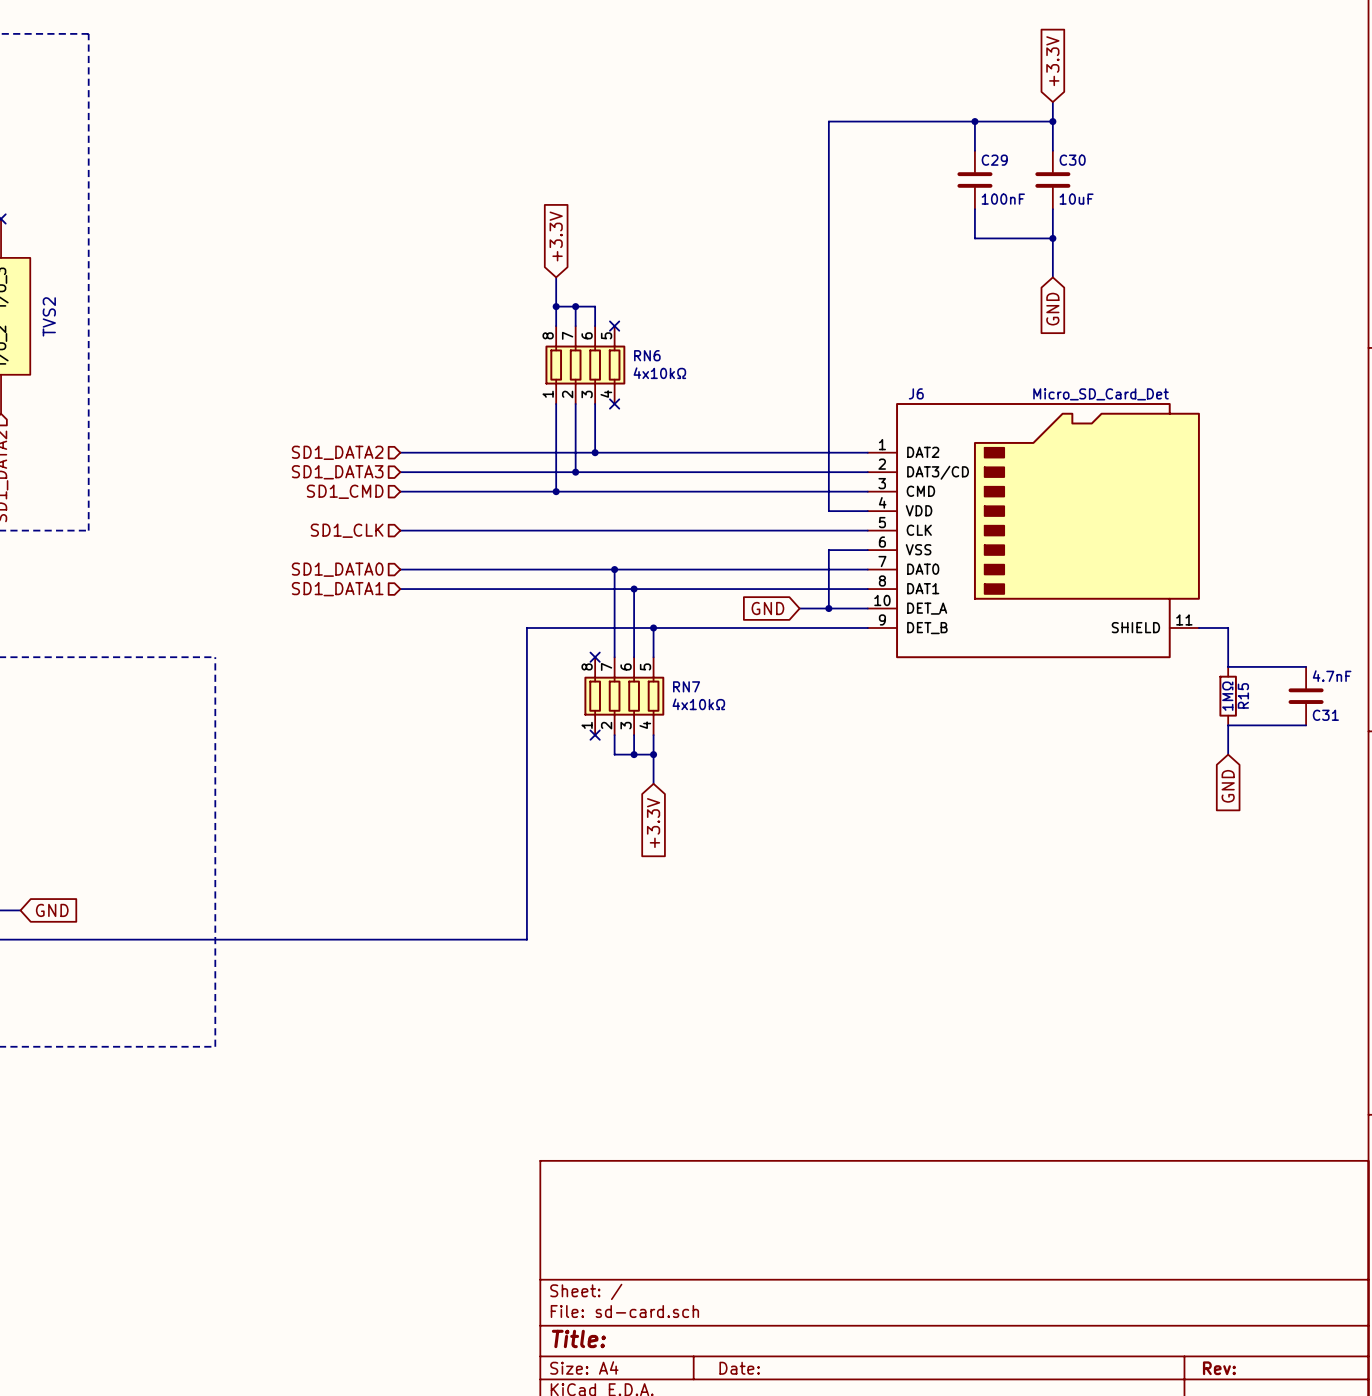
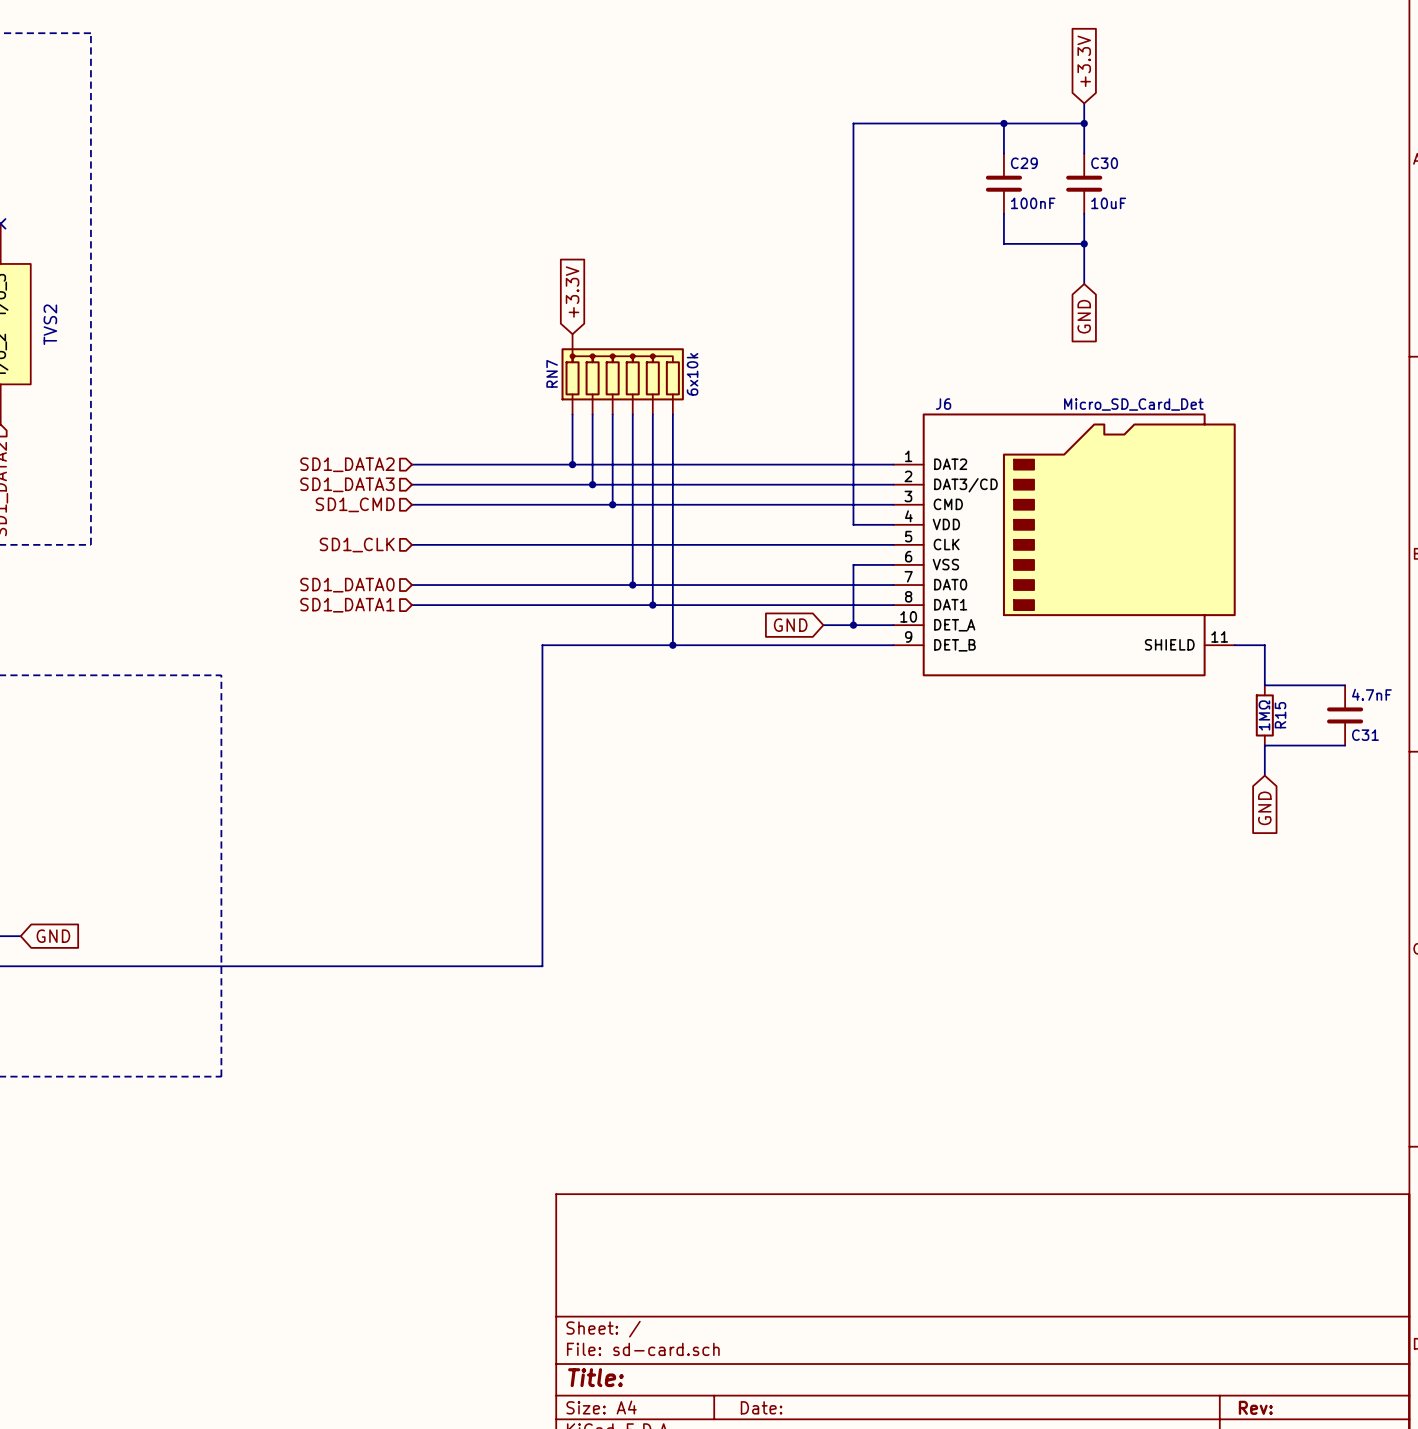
global label position: +3.3V (556, 236) -> +3.3V (572, 292)
wire: (556, 277) (556, 326) -> none
wire: (556, 306) (595, 306) (595, 326) -> none
junction: (556, 306) -> none
wire: (575, 306) (575, 326) -> none
junction: (575, 306) -> none
no-connect mark: (614, 326) -> none
RN6: 4x10kΩ (585, 365) -> none
no-connect mark: (614, 404) -> none
wire: (556, 452) (556, 491) -> (612, 464) (612, 504)
junction: none -> (572, 464)
junction: (595, 452) -> none
junction: (556, 491) -> none
junction: none -> (612, 504)
wire: (614, 569) (614, 657) -> (632, 585) (632, 414)
wire: (634, 589) (634, 657) -> (652, 605) (652, 414)
wire: (653, 627) (653, 657) -> (672, 645) (672, 414)
RN7 symbol: [584, 657, 665, 736] -> [561, 334, 684, 415]
no-connect mark: (595, 657) -> none
RN7 name position: RN7 (686, 686) -> RN7 (552, 373)
RN7 value: 4x10kΩ (698, 704) -> 6x10k (692, 374)
no-connect mark: (595, 735) -> none
wire: (614, 735) (614, 754) (653, 754) -> none
wire: (634, 735) (634, 754) -> none
wire: (653, 735) (653, 783) -> none
junction: (634, 754) -> none
junction: (653, 754) -> none
global label: +3.3V (653, 823) -> none

